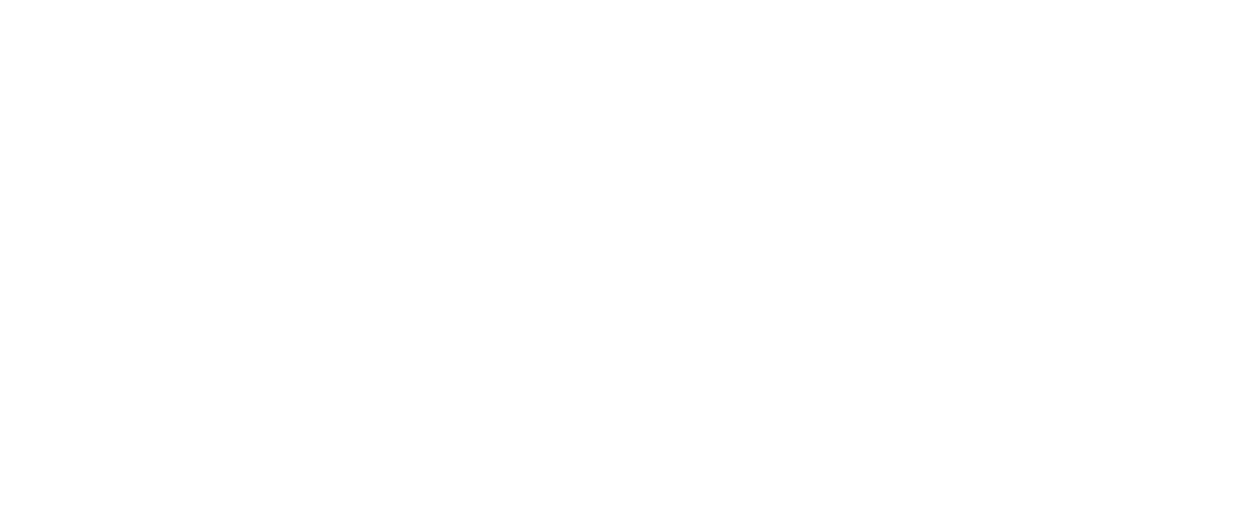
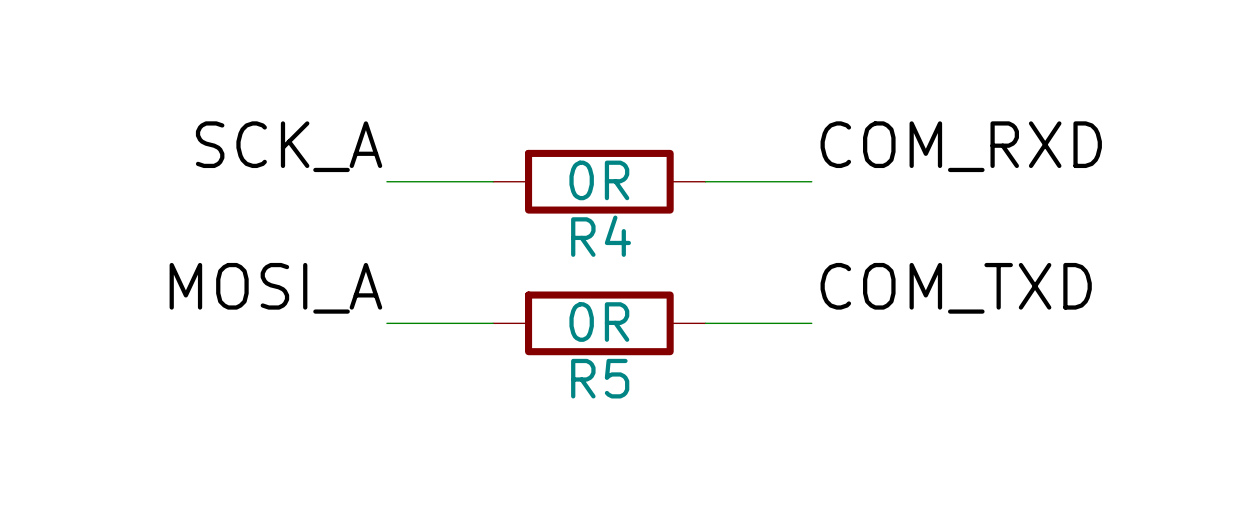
label: none -> SCK_A (289, 146)
label: none -> COM_RXD (961, 146)
wire: none -> (386, 181) (493, 181)
R4: none -> 0R (599, 181)
wire: none -> (705, 181) (811, 181)
label: none -> MOSI_A (275, 288)
label: none -> COM_TXD (956, 288)
wire: none -> (386, 323) (493, 323)
R5: none -> 0R (599, 323)
wire: none -> (705, 323) (811, 323)

